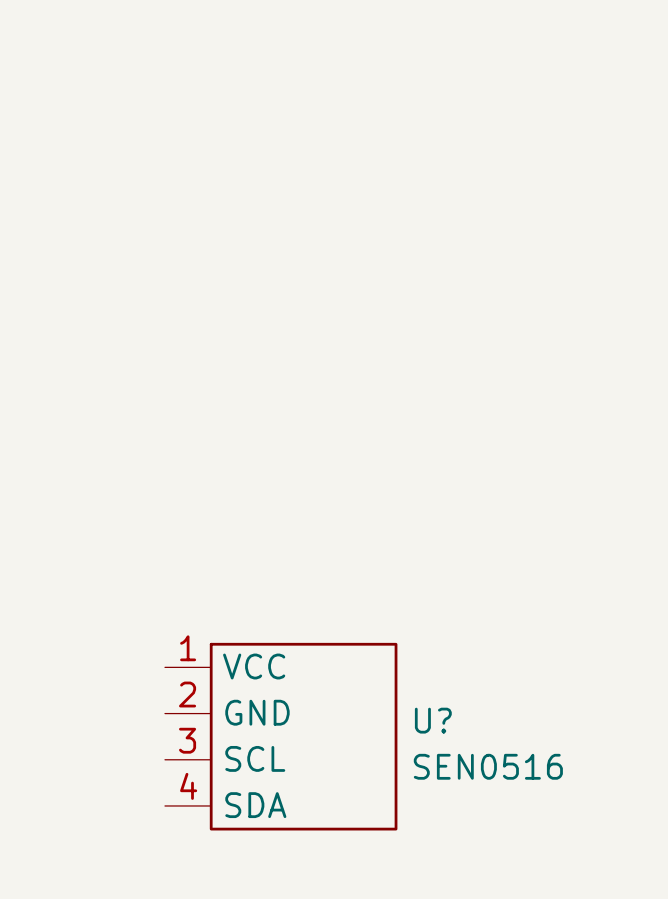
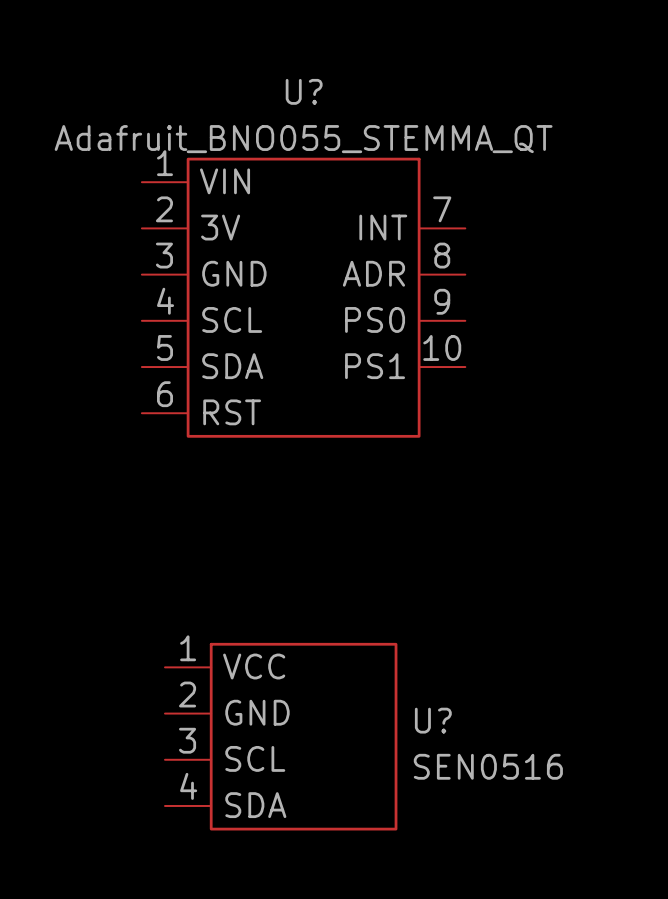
U?: none -> Adafruit_BNO055_STEMMA_QT (303, 297)

